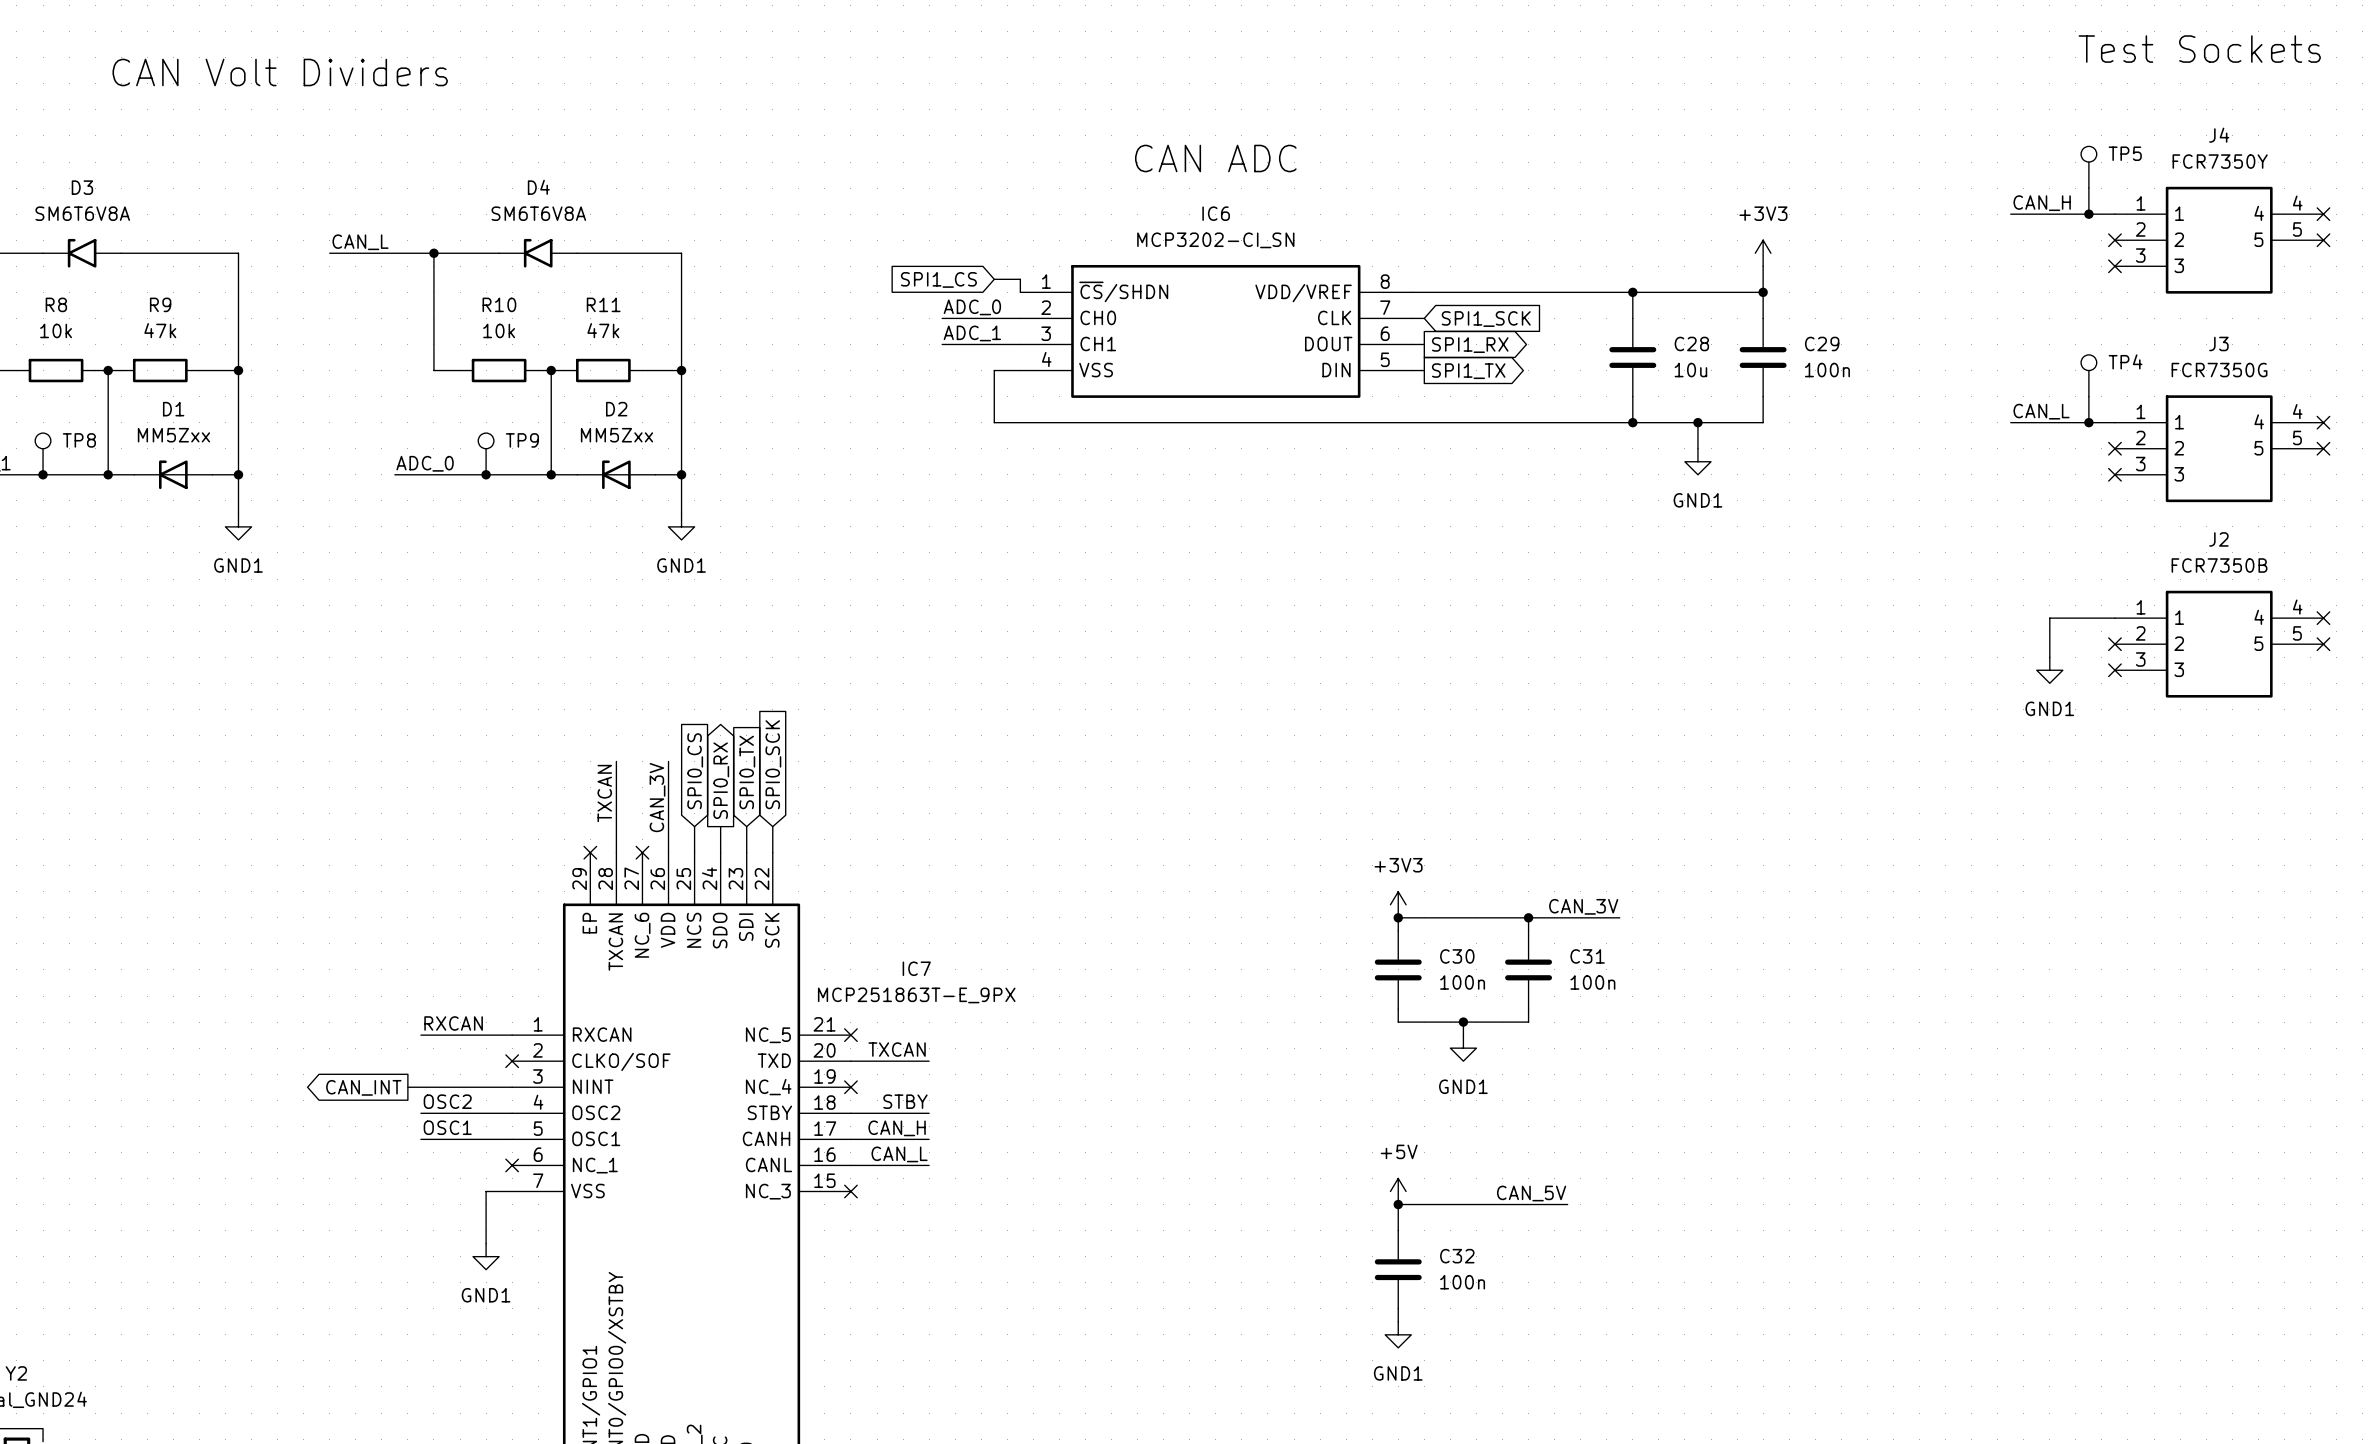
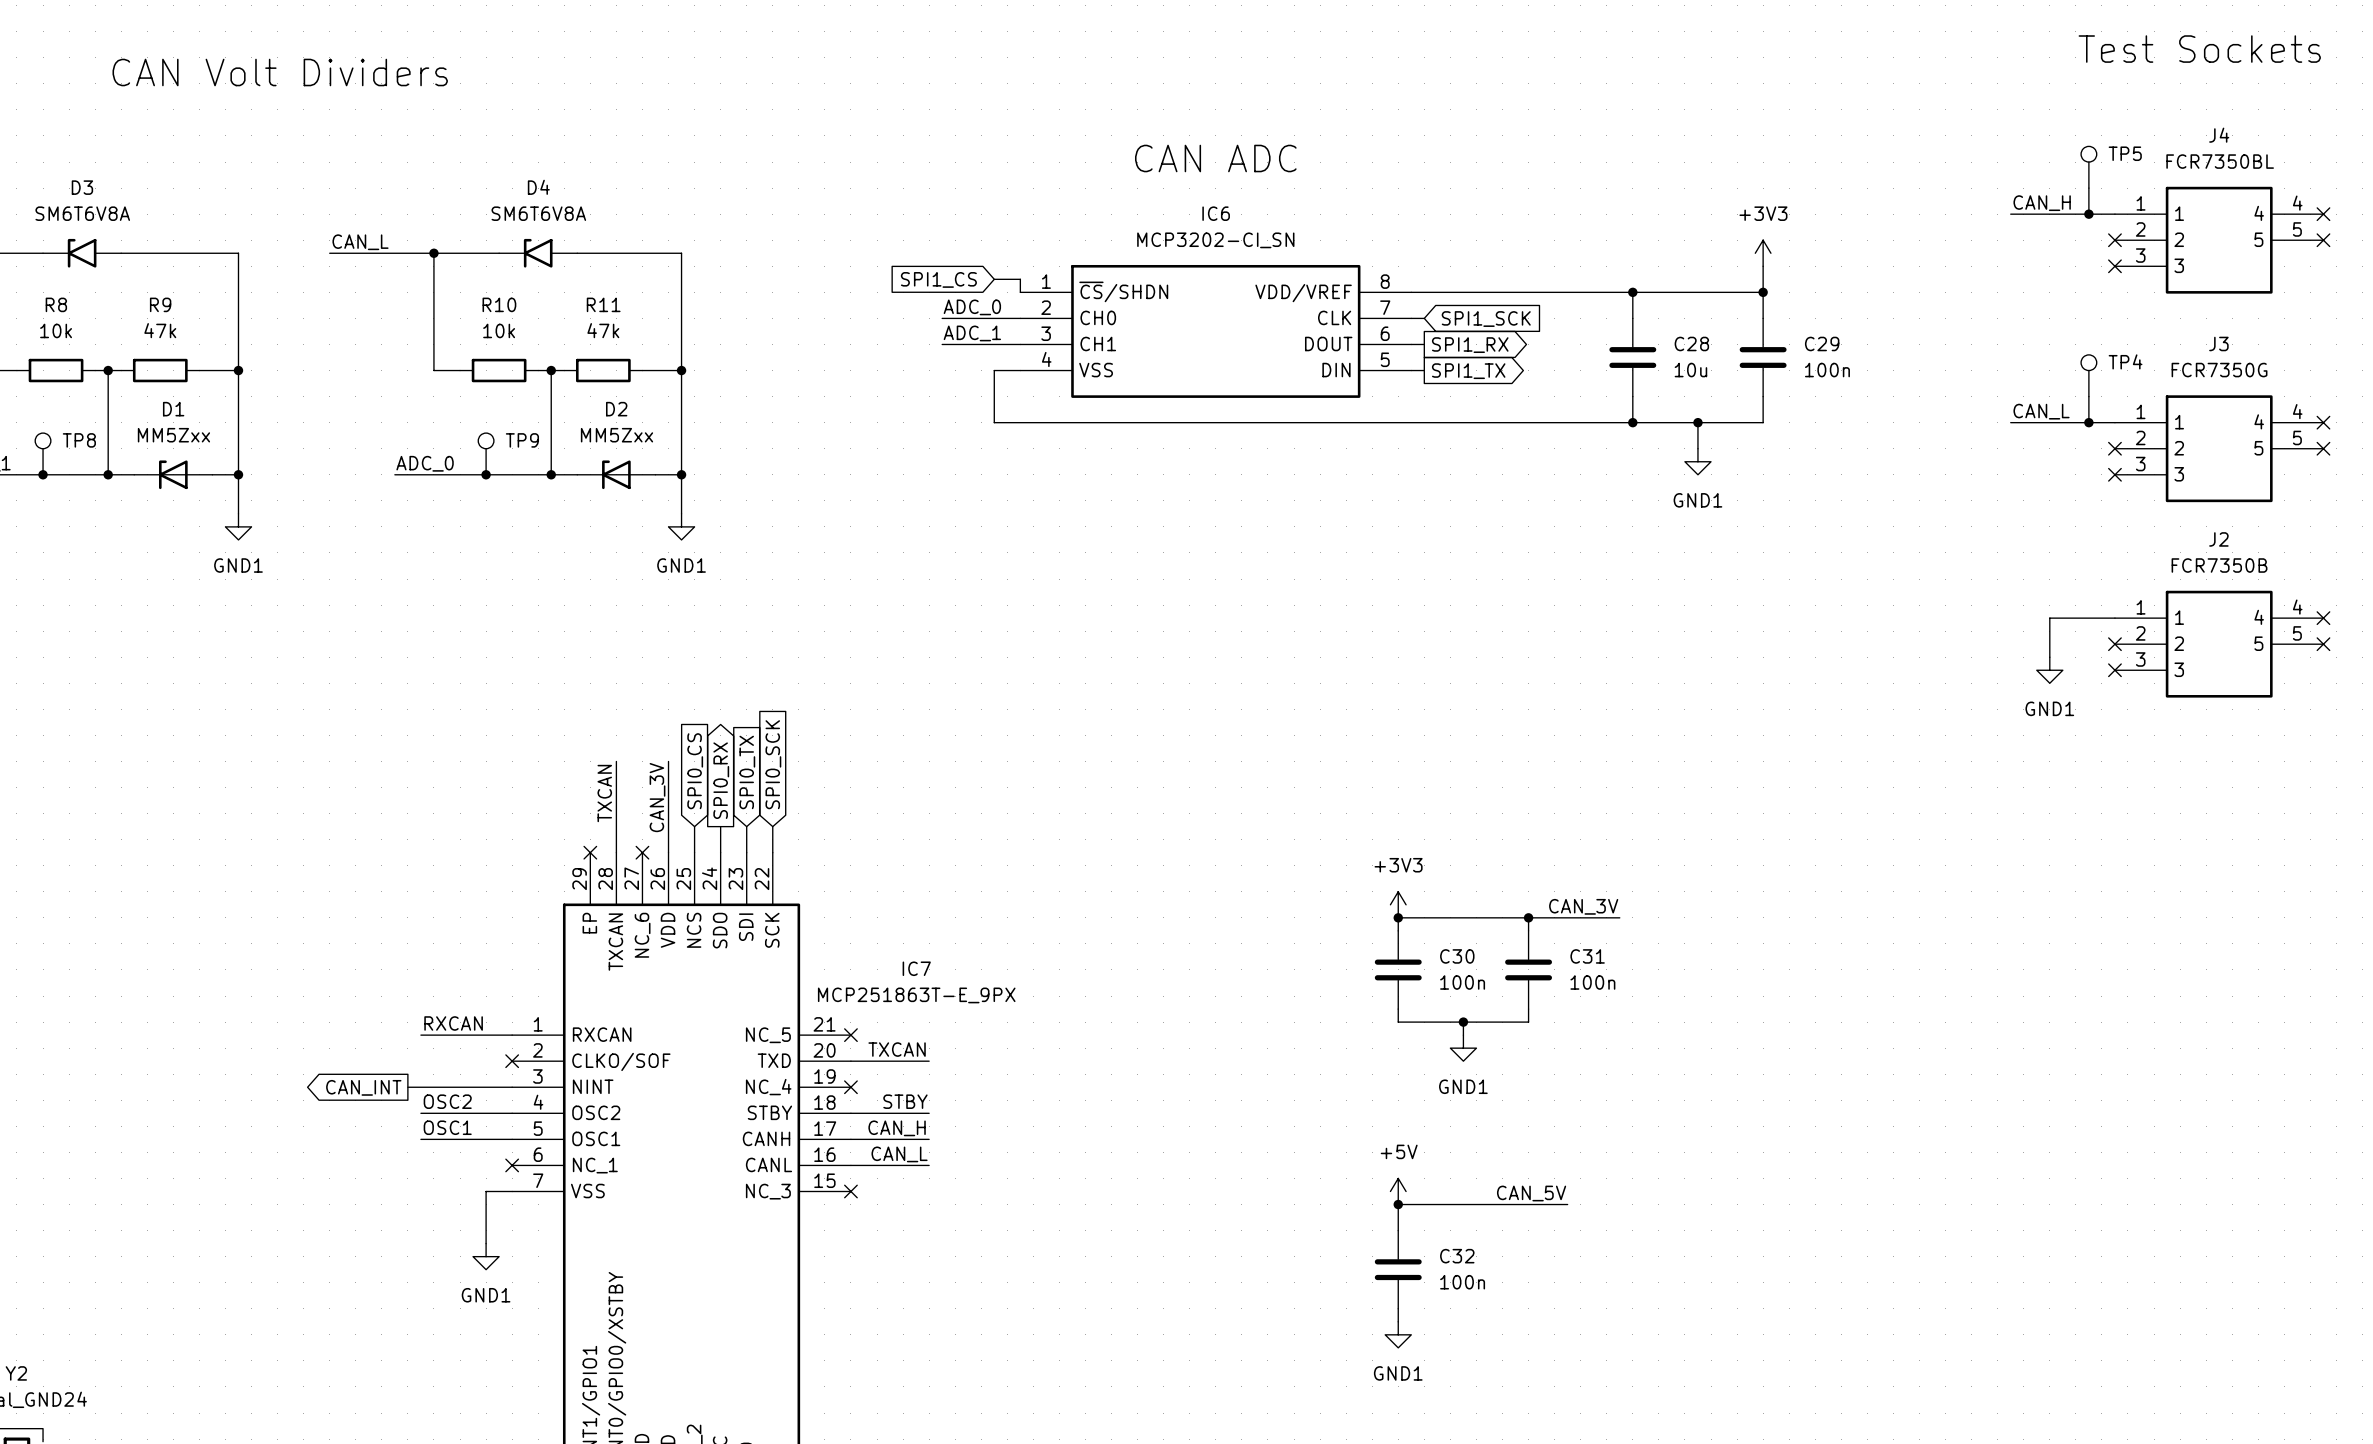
J4 value: FCR7350Y (2220, 161) -> FCR7350BL (2220, 161)

